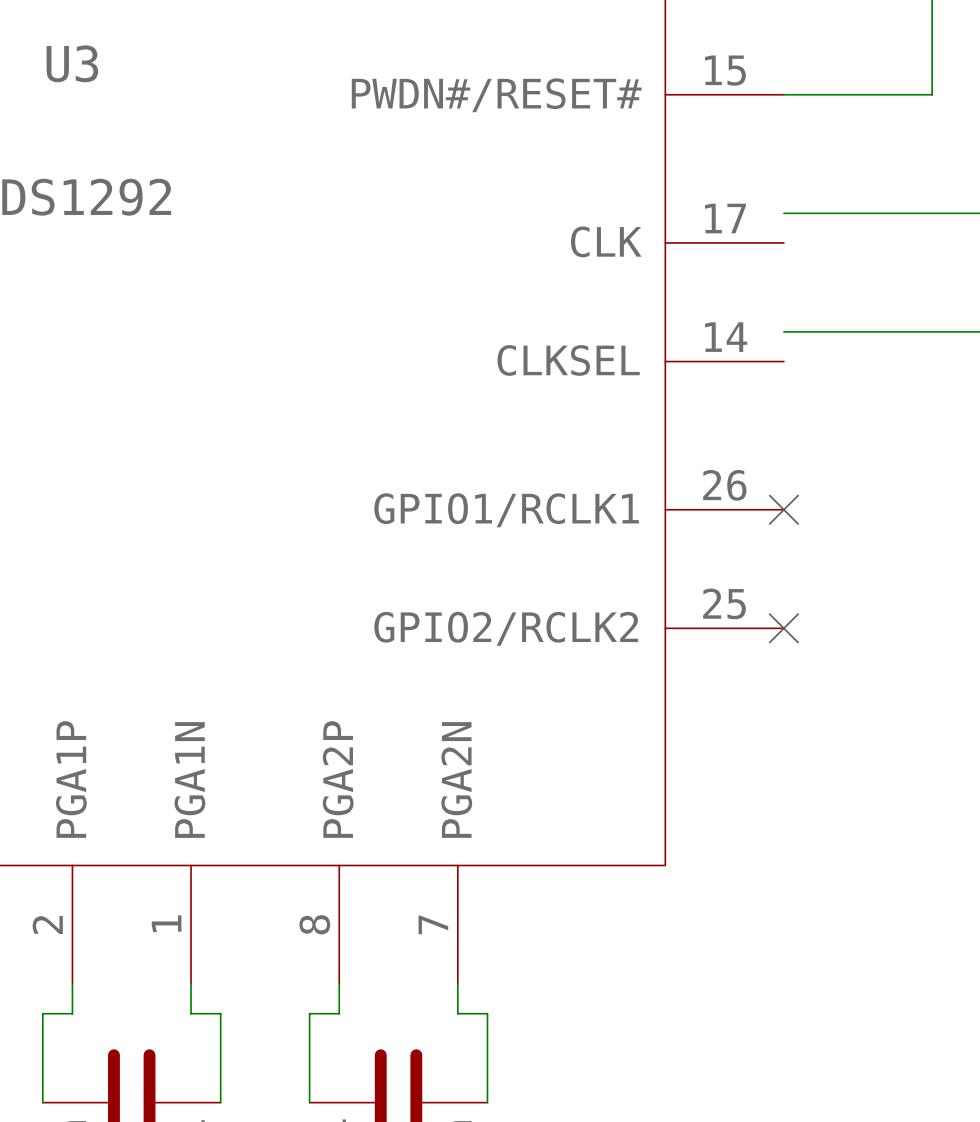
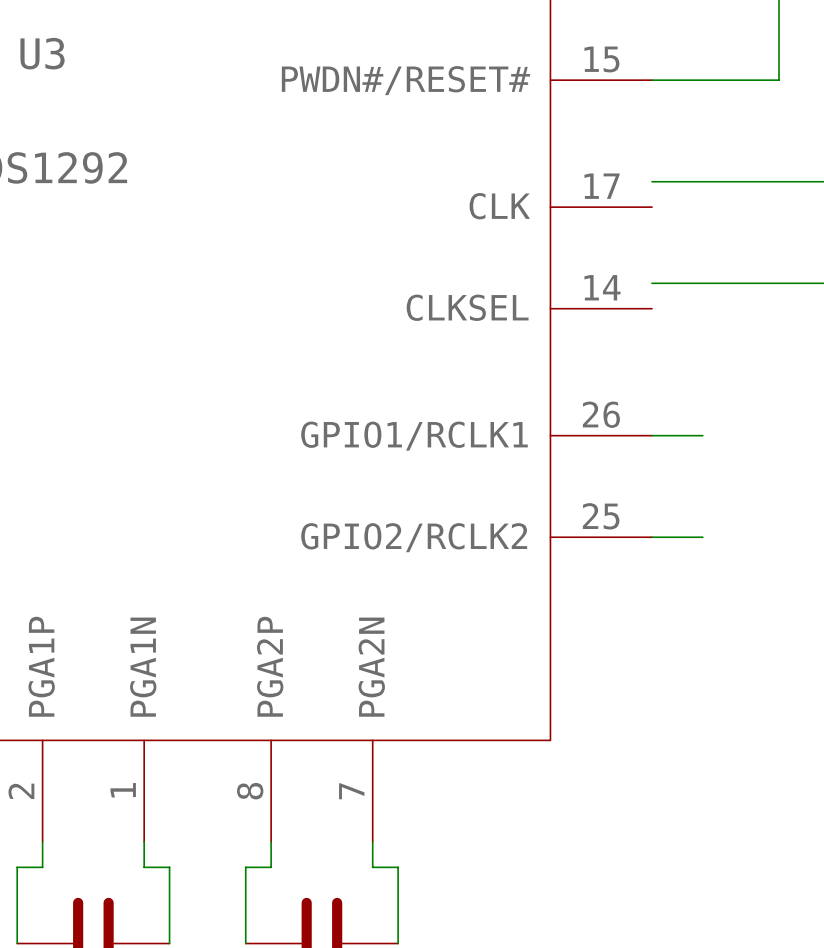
wire: none -> (652, 435) (702, 435)
no-connect mark: (783, 509) -> none
wire: none -> (652, 537) (702, 537)
no-connect mark: (783, 628) -> none

